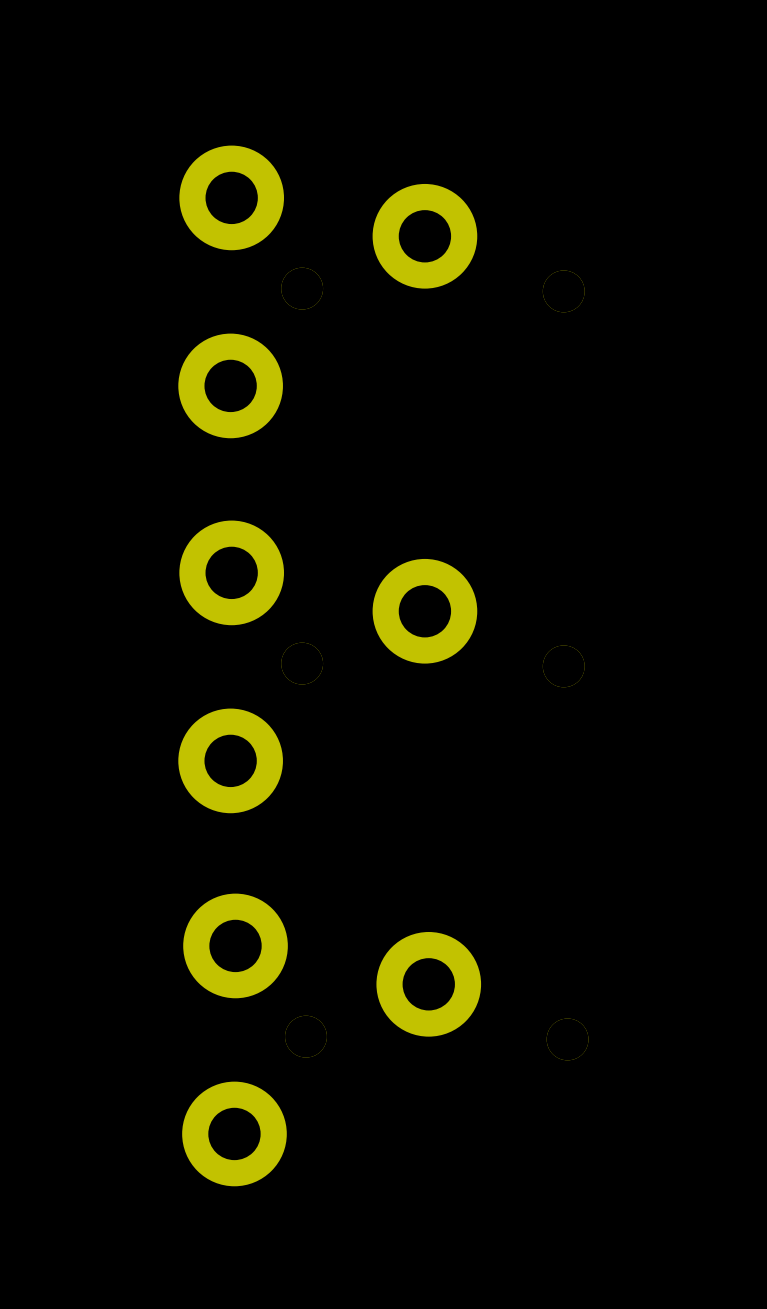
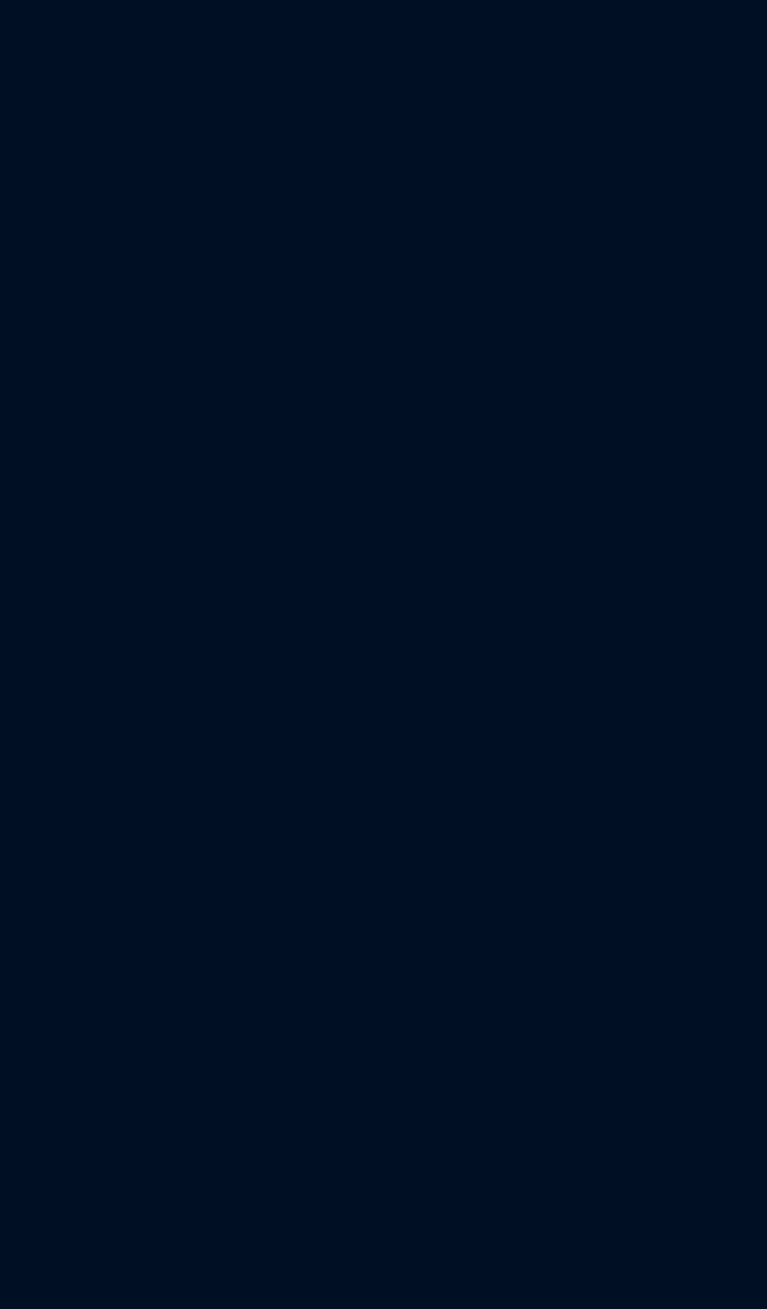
part: (381, 291) -> none
part: (381, 666) -> none
part: (385, 1039) -> none

